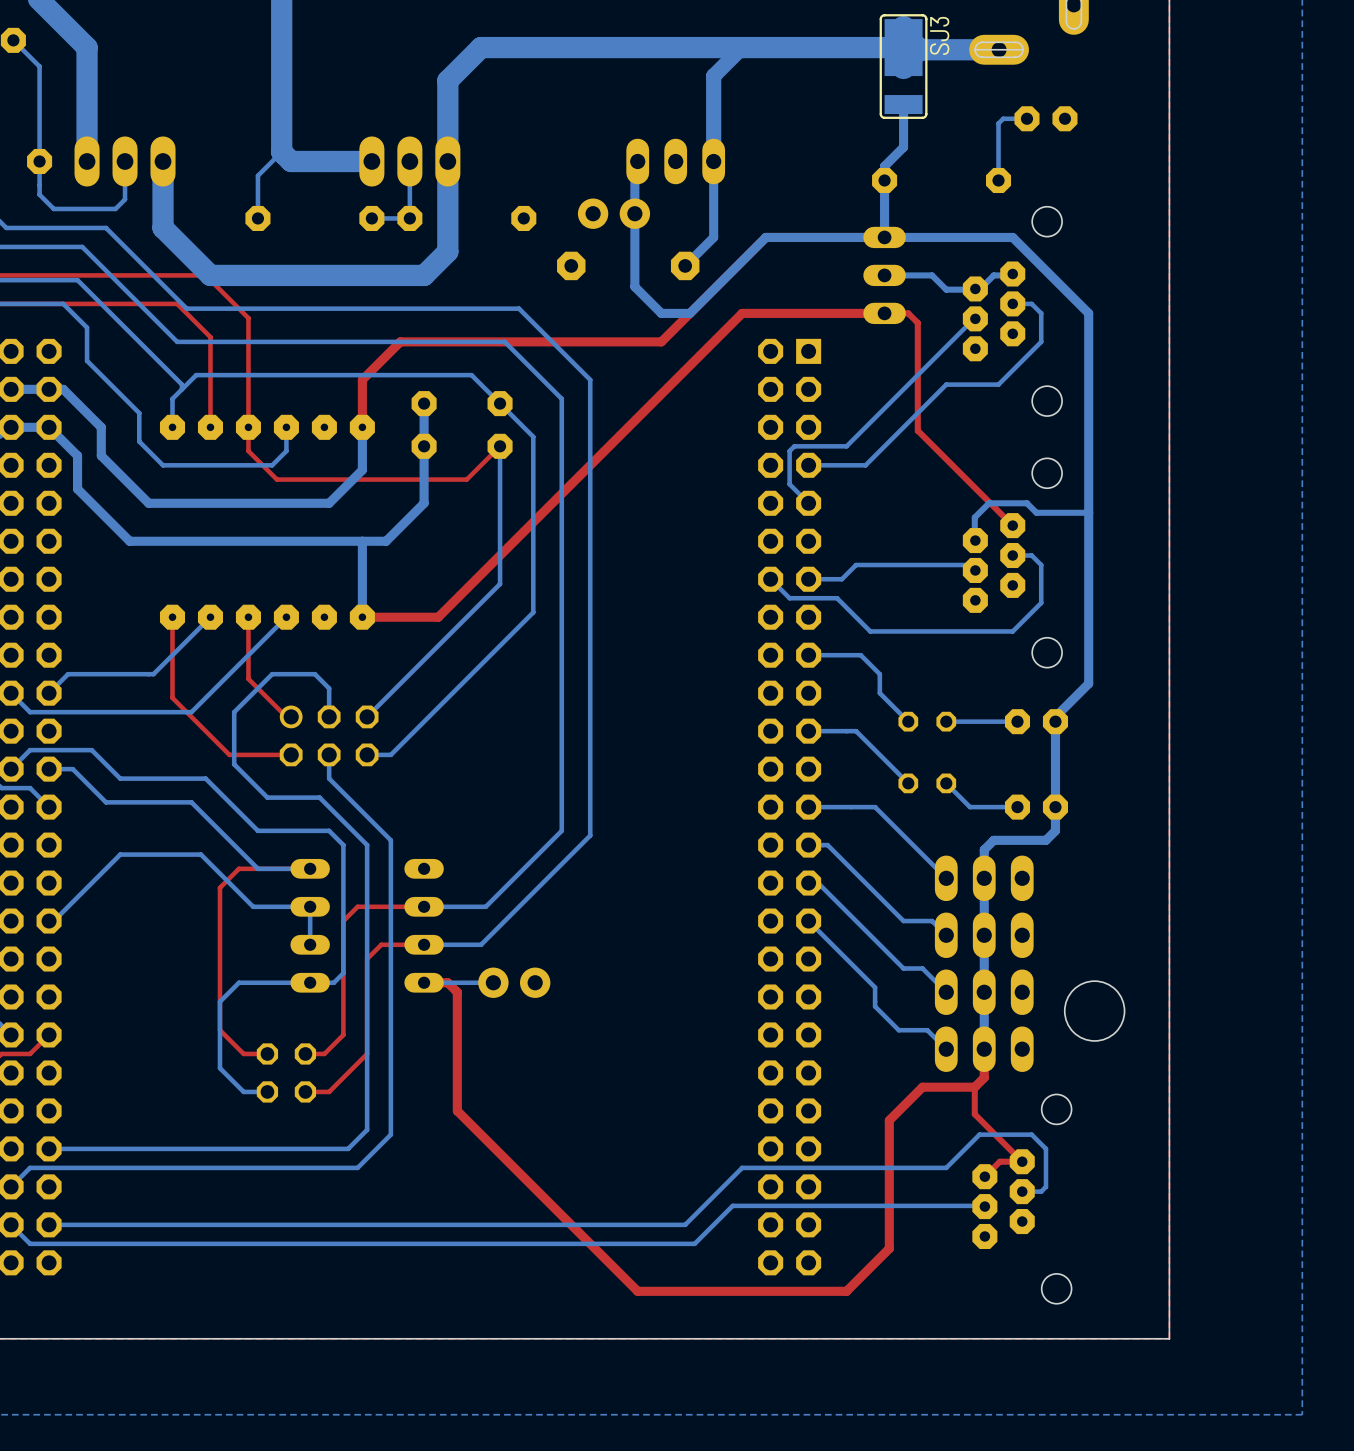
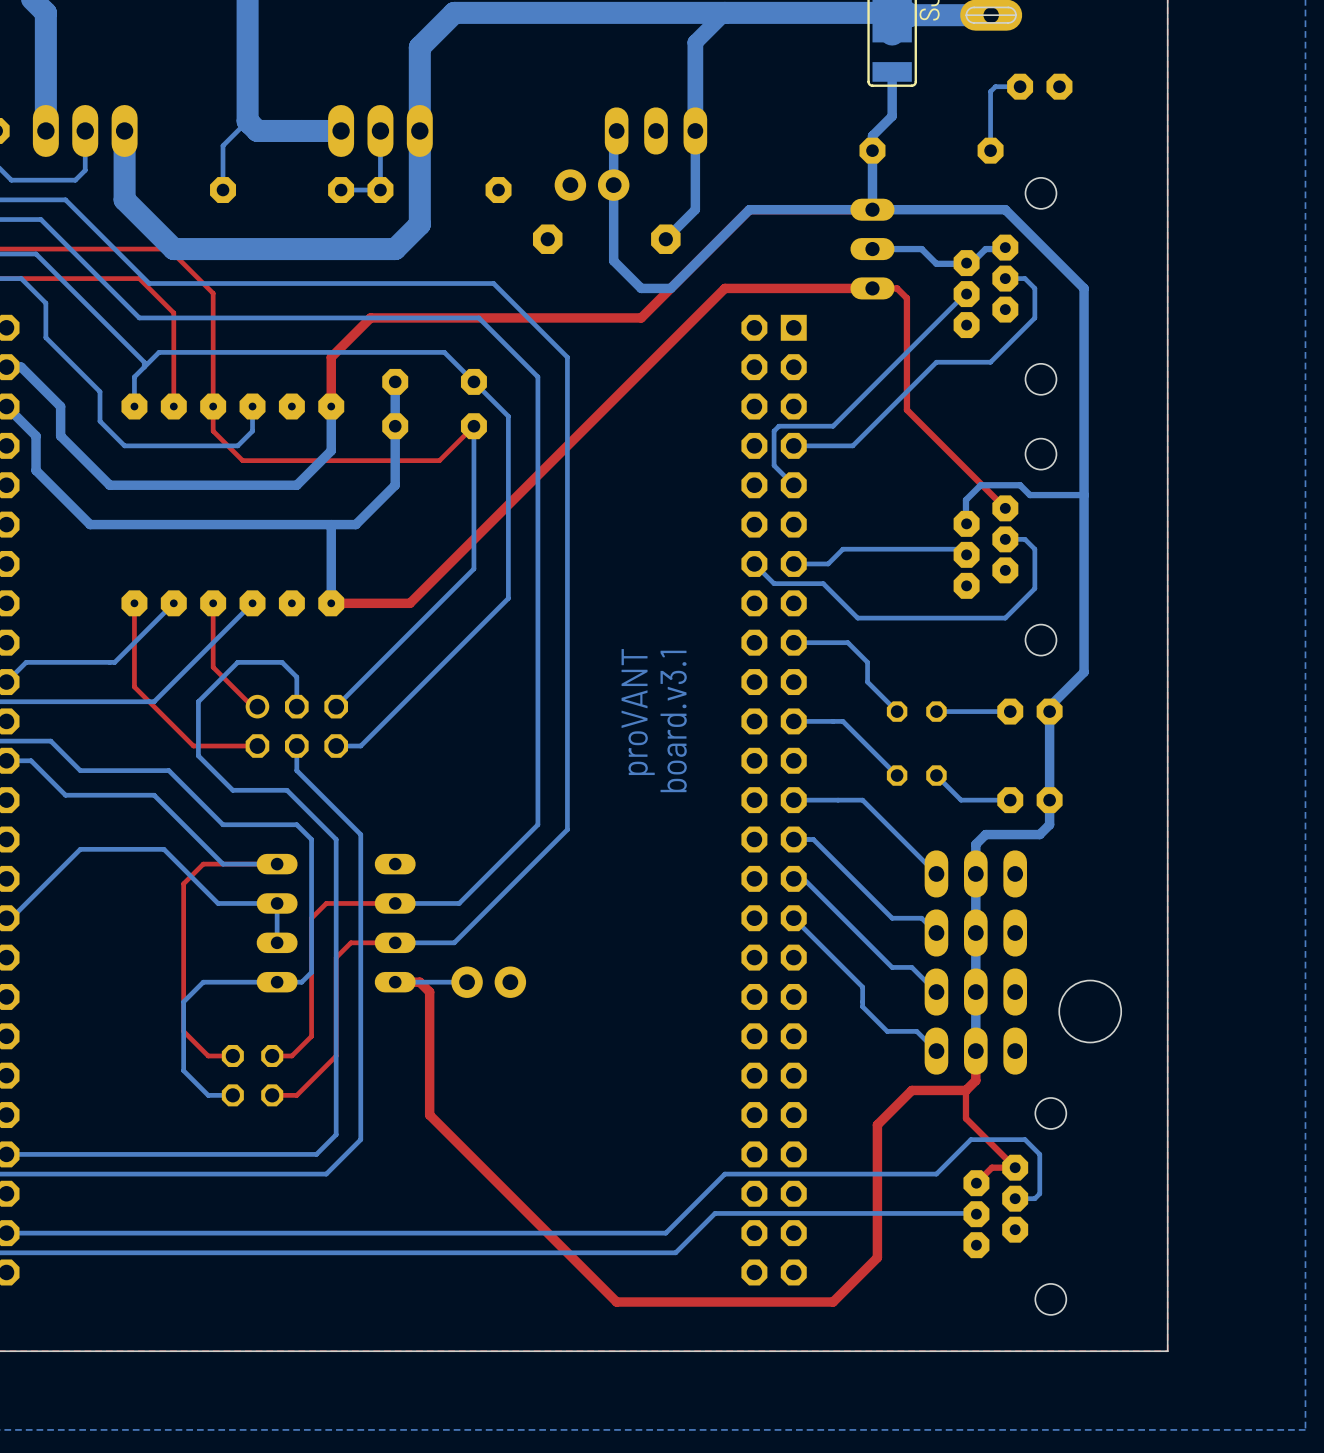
text: none -> proVANT (638, 712)
text: none -> board.v3.1 (673, 721)

